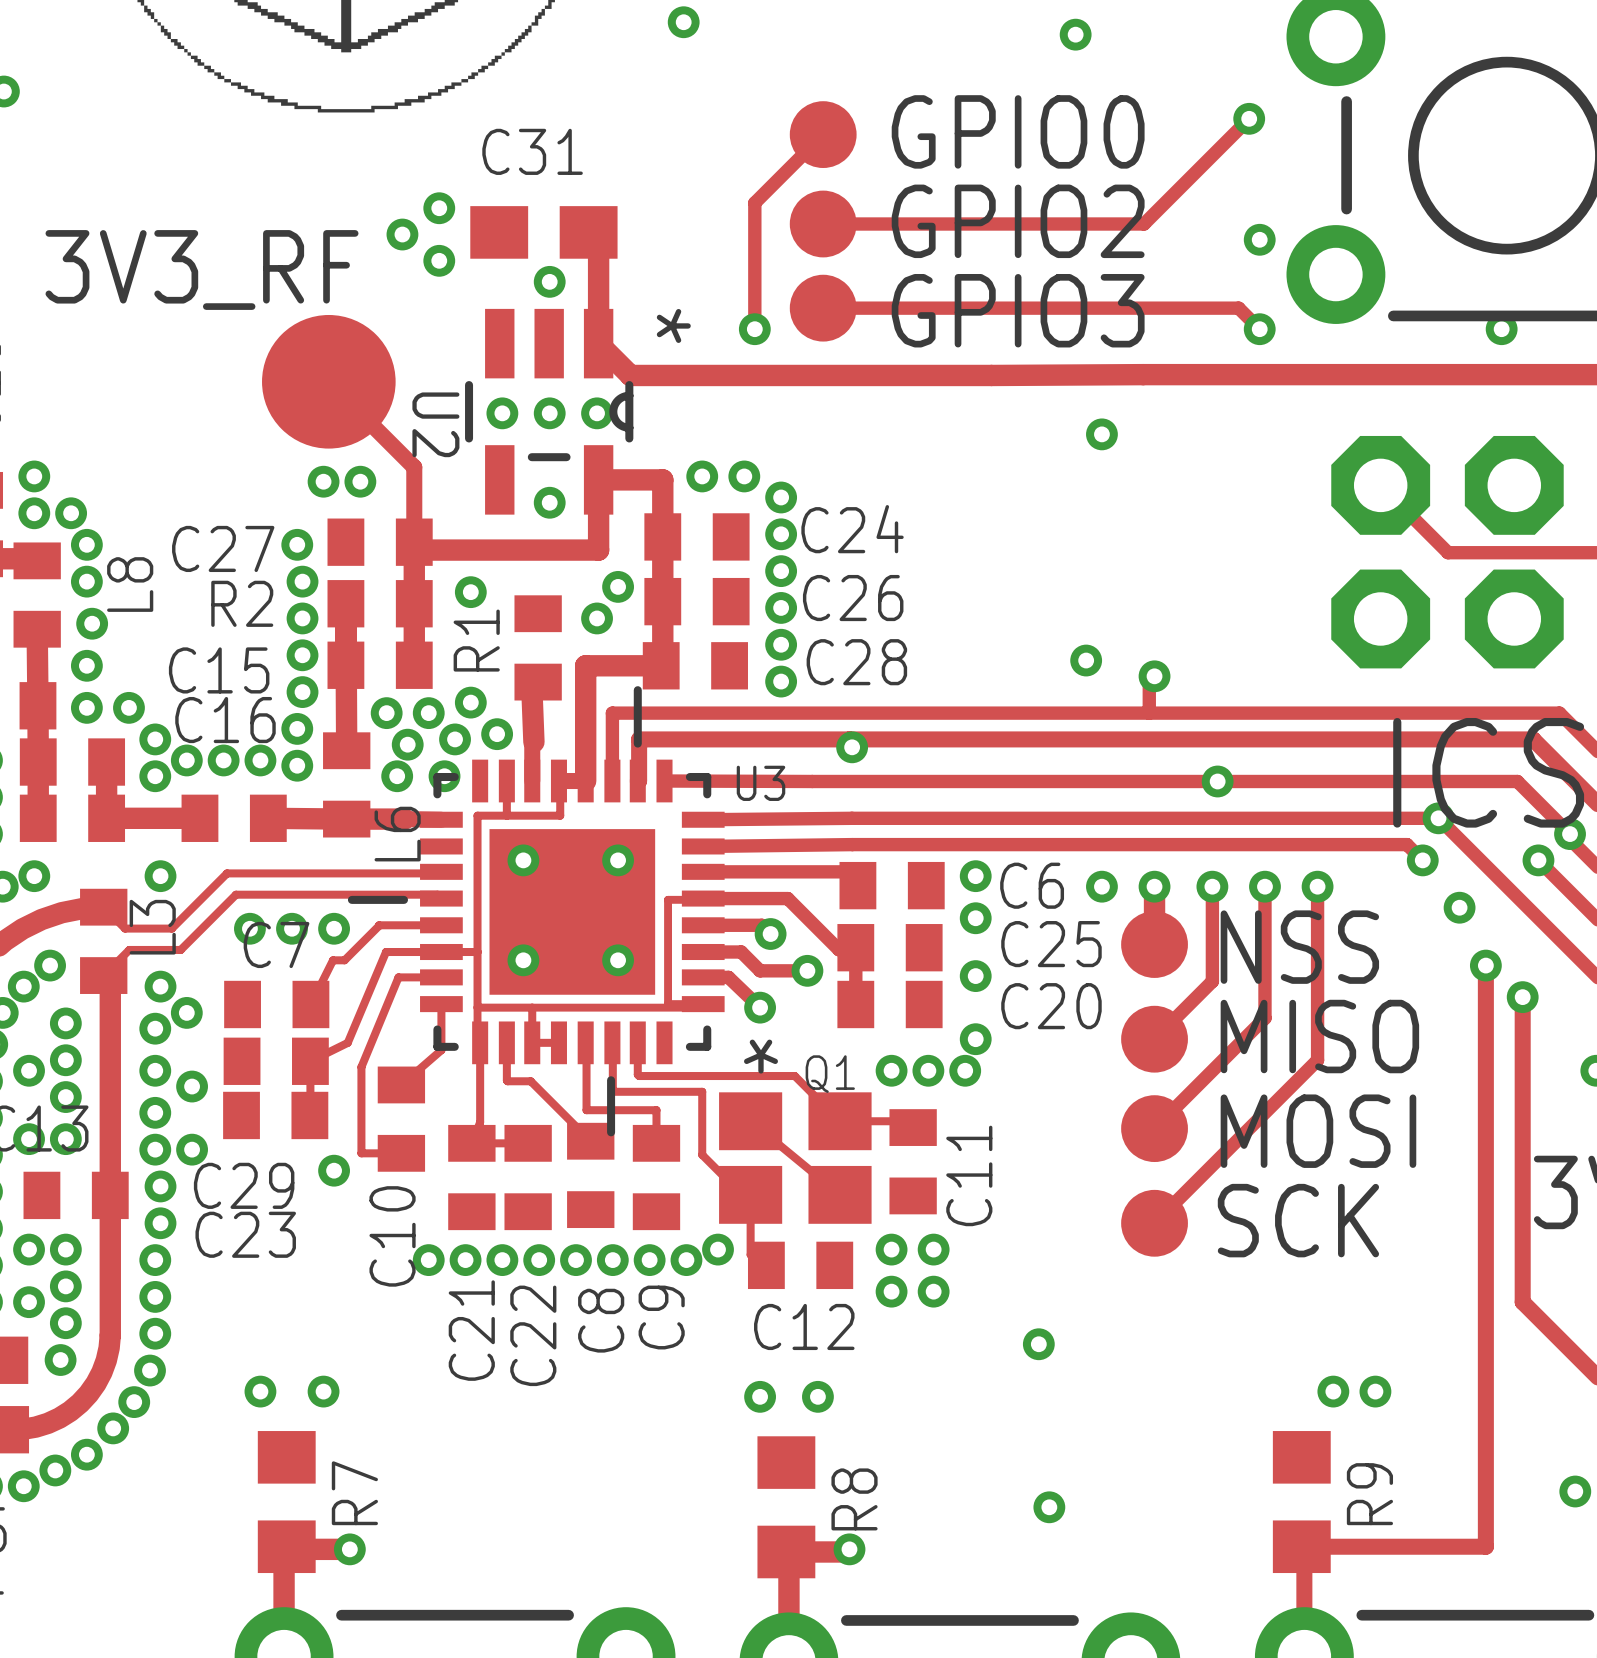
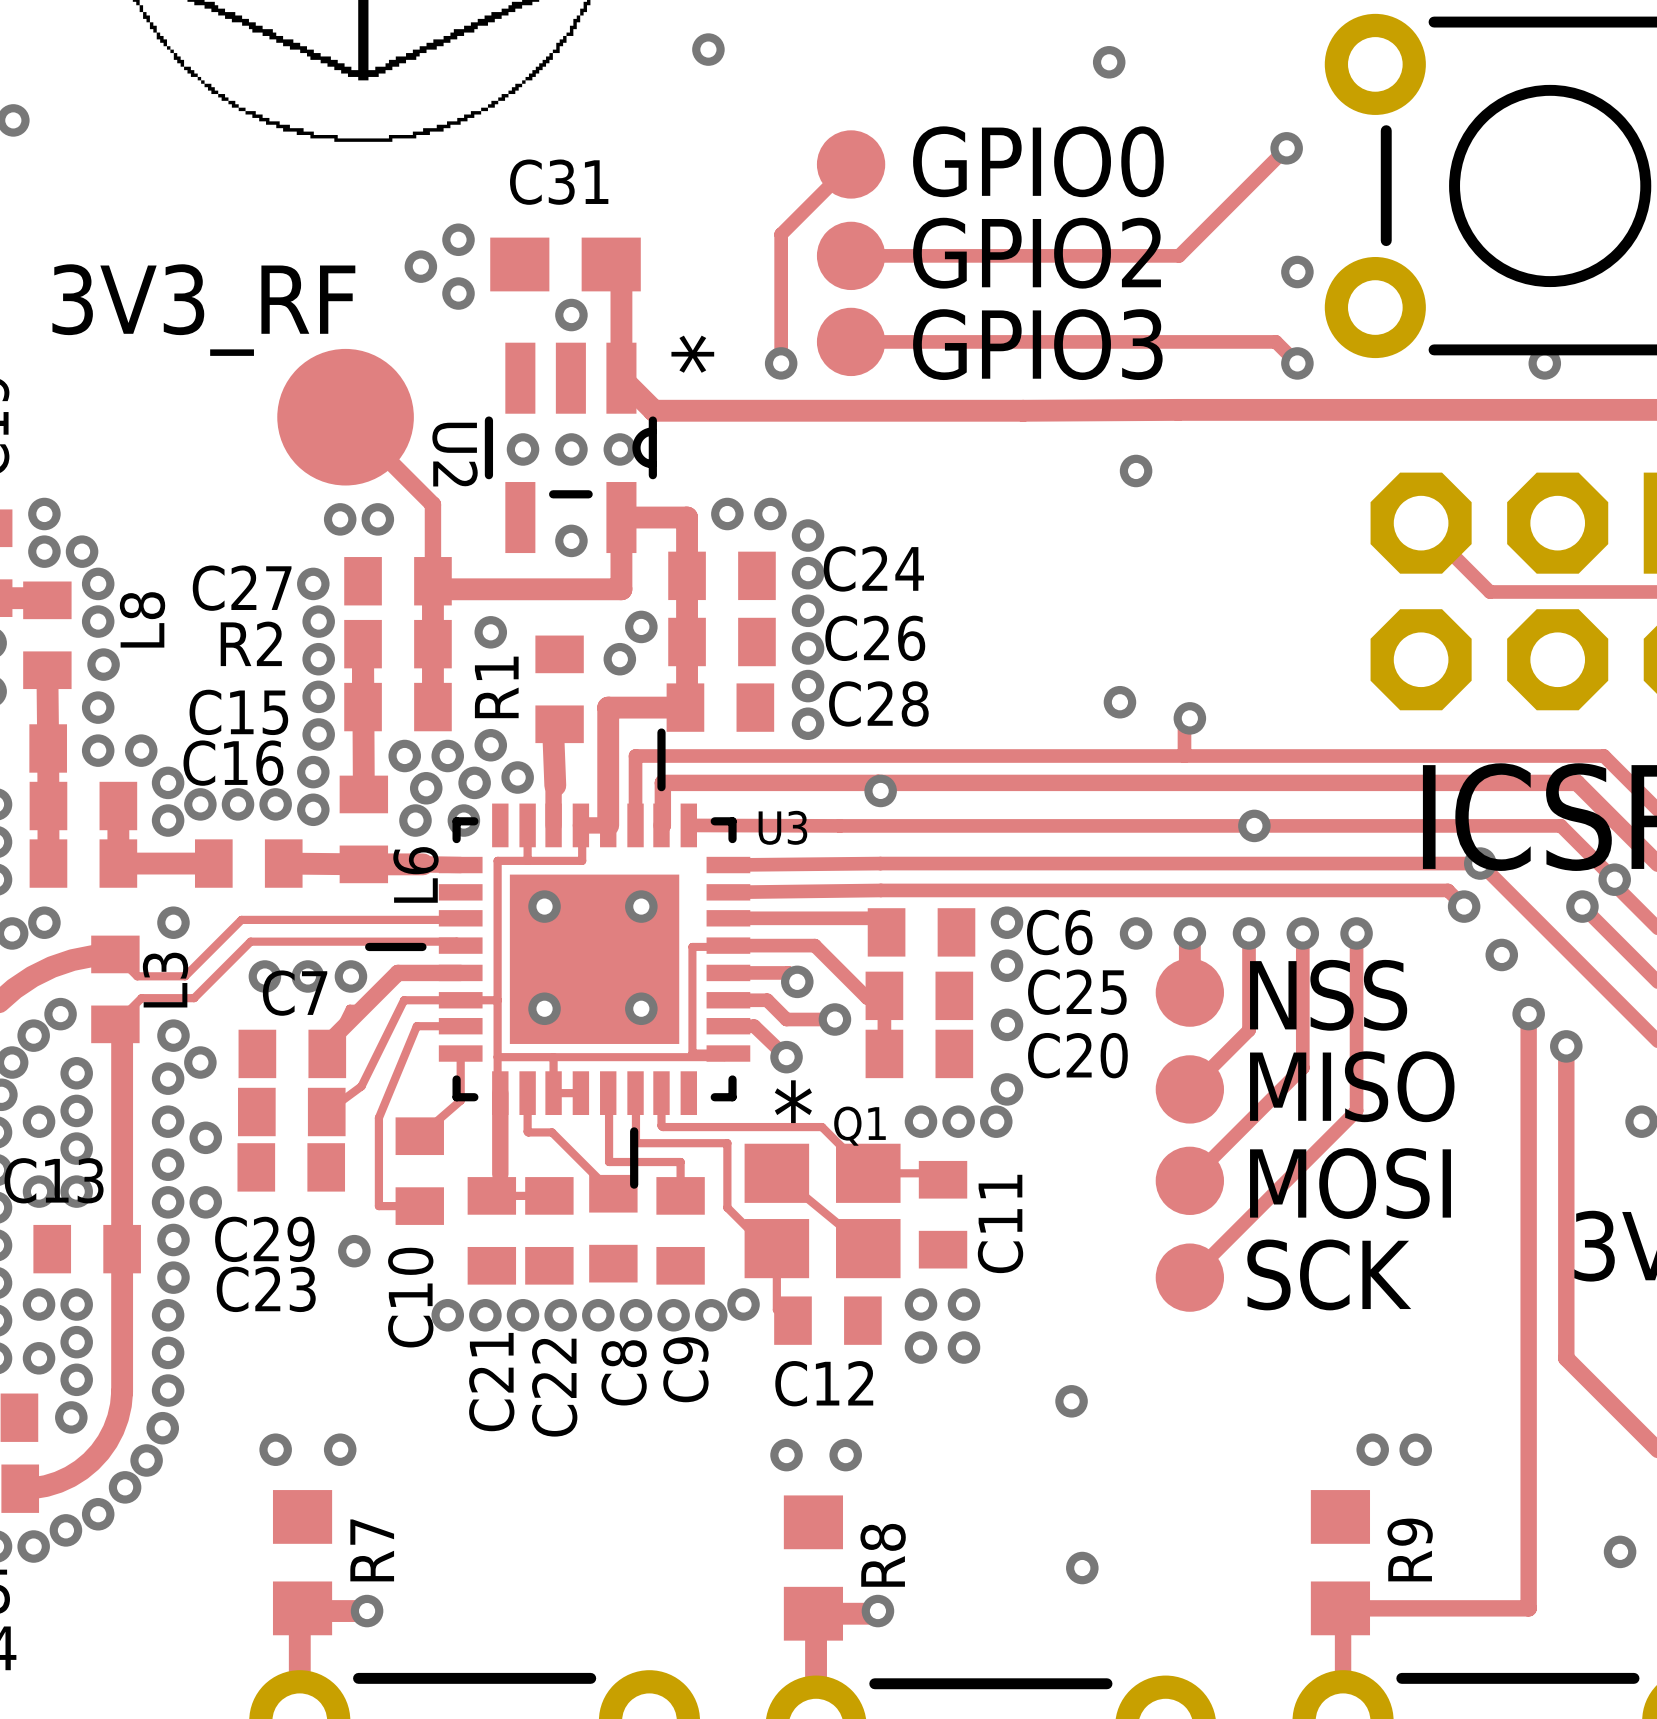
track width: thin (379, 925) (441, 925) -> thick (396, 972) (460, 972)
track width: thin (379, 925) (344, 960) -> thick (396, 973) (361, 1008)
track: (386, 952) (347, 1042) (310, 1061) (310, 1114) -> (404, 1000) (361, 1086) (326, 1112)
track width: thin (480, 1042) (480, 1122) -> thick (500, 1093) (500, 1174)
via position: (334, 1170) -> (354, 1251)

